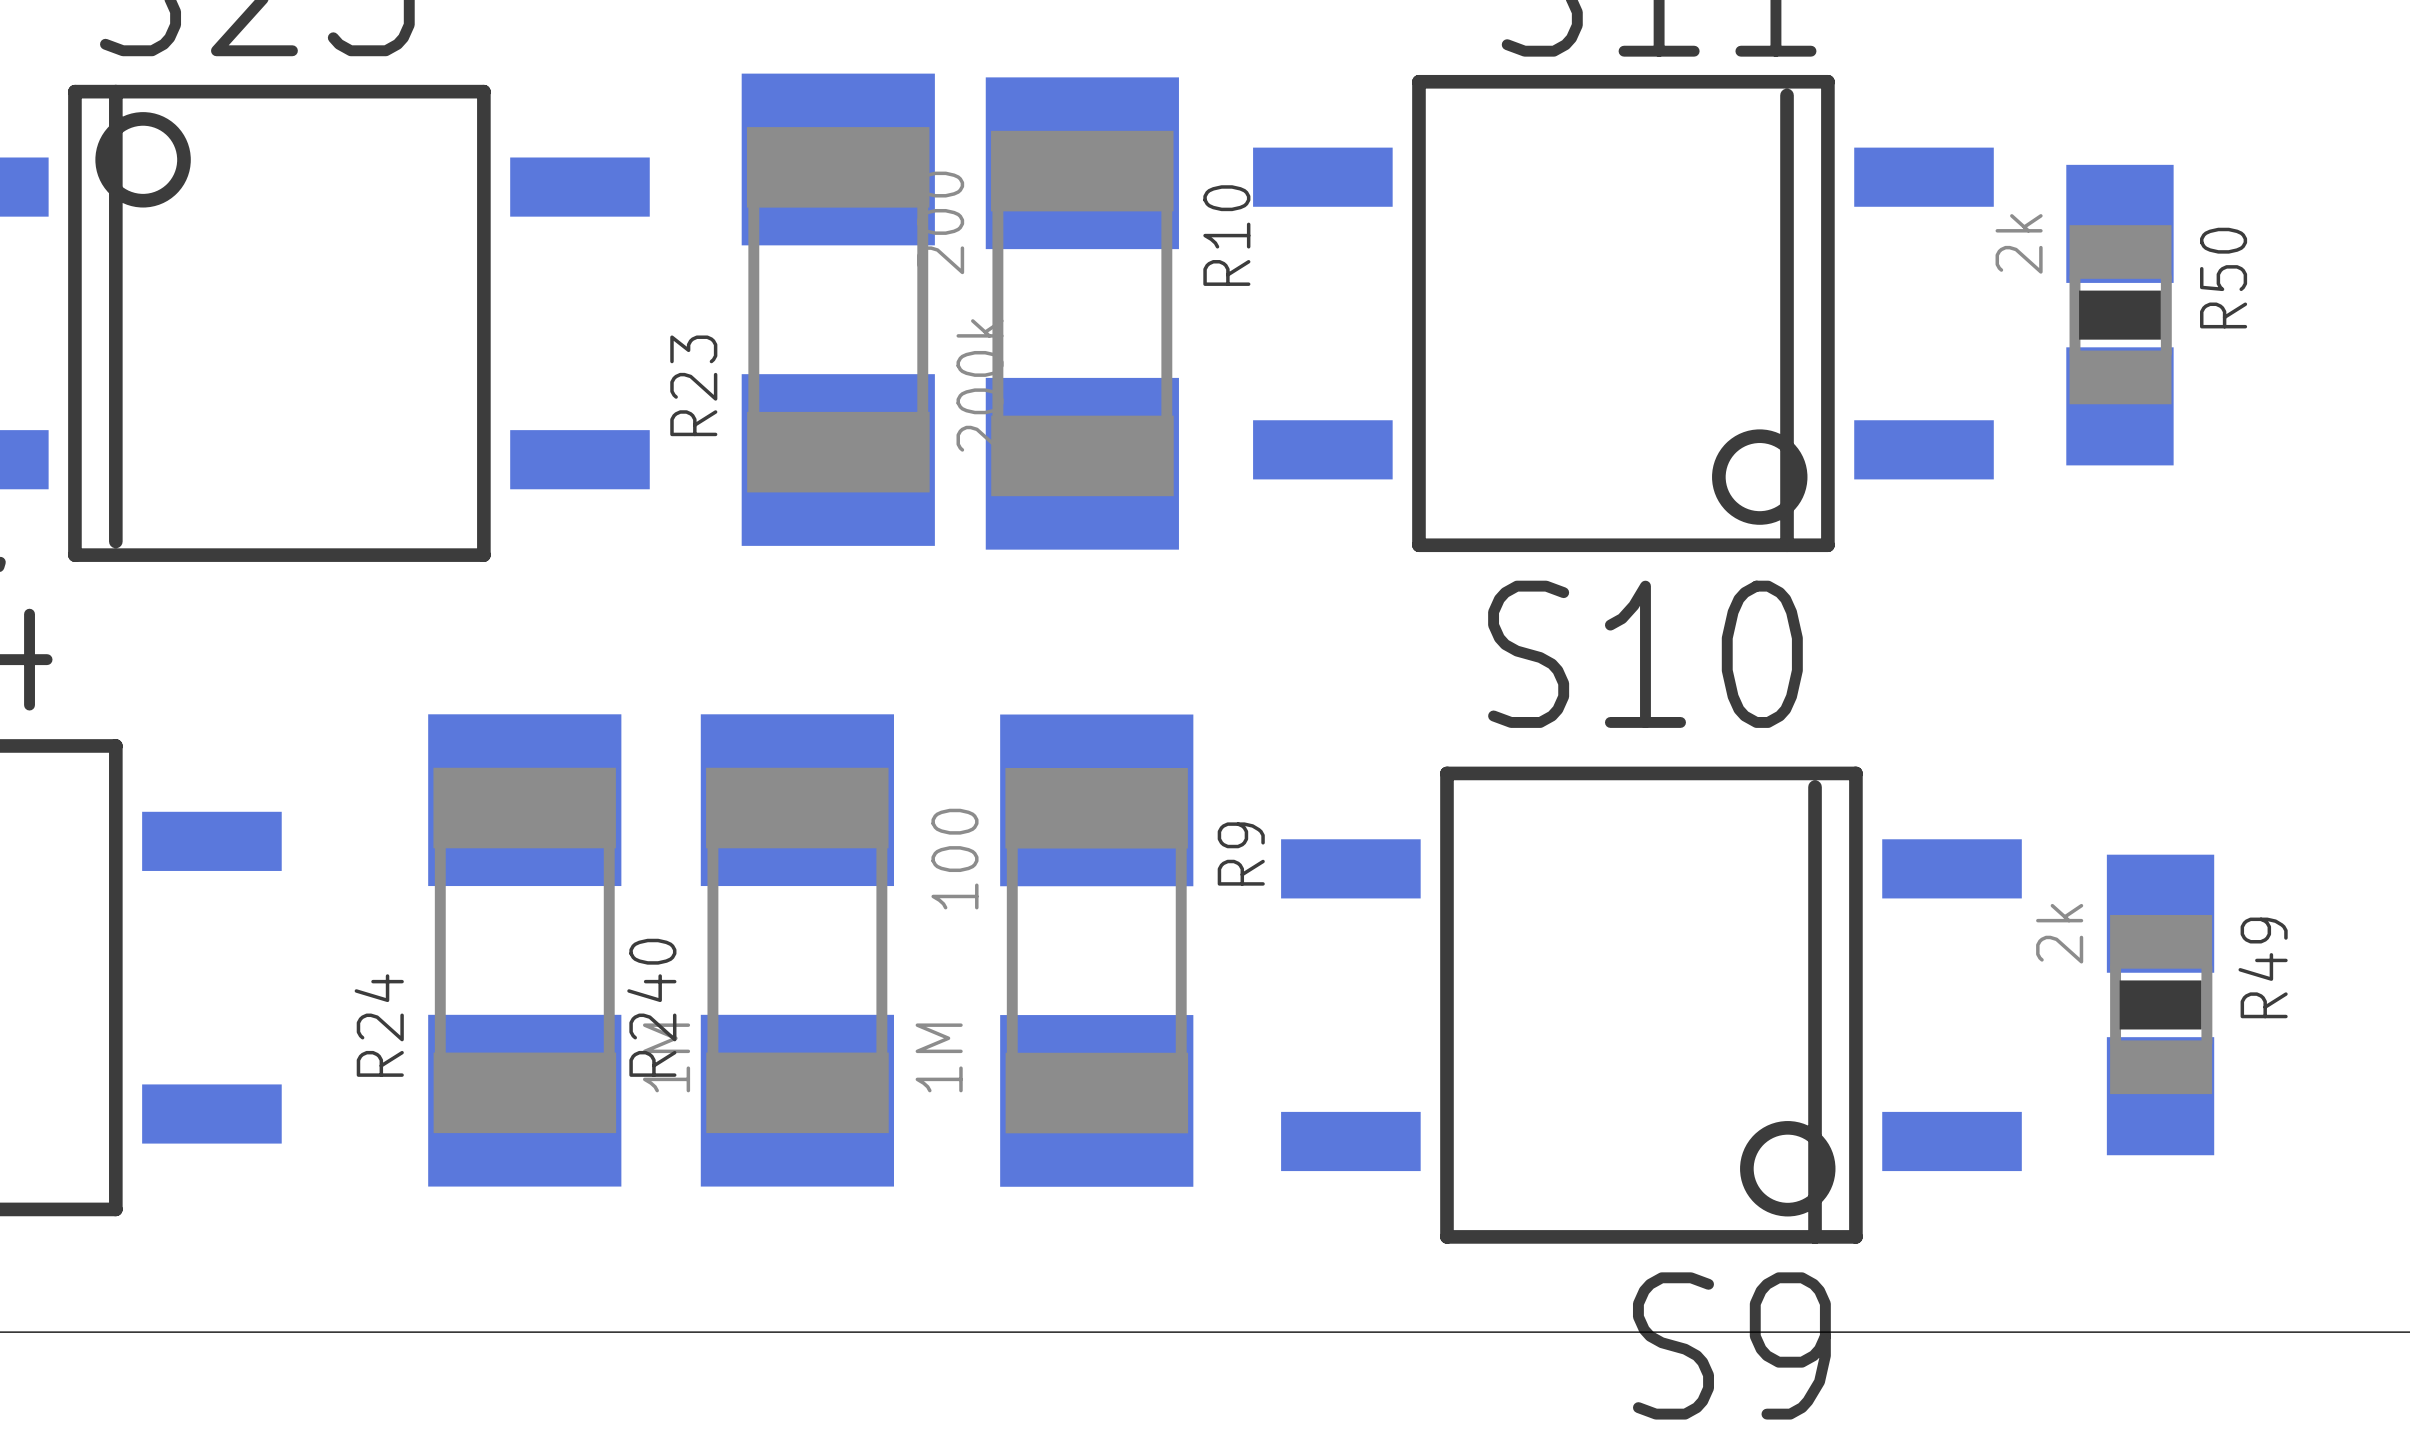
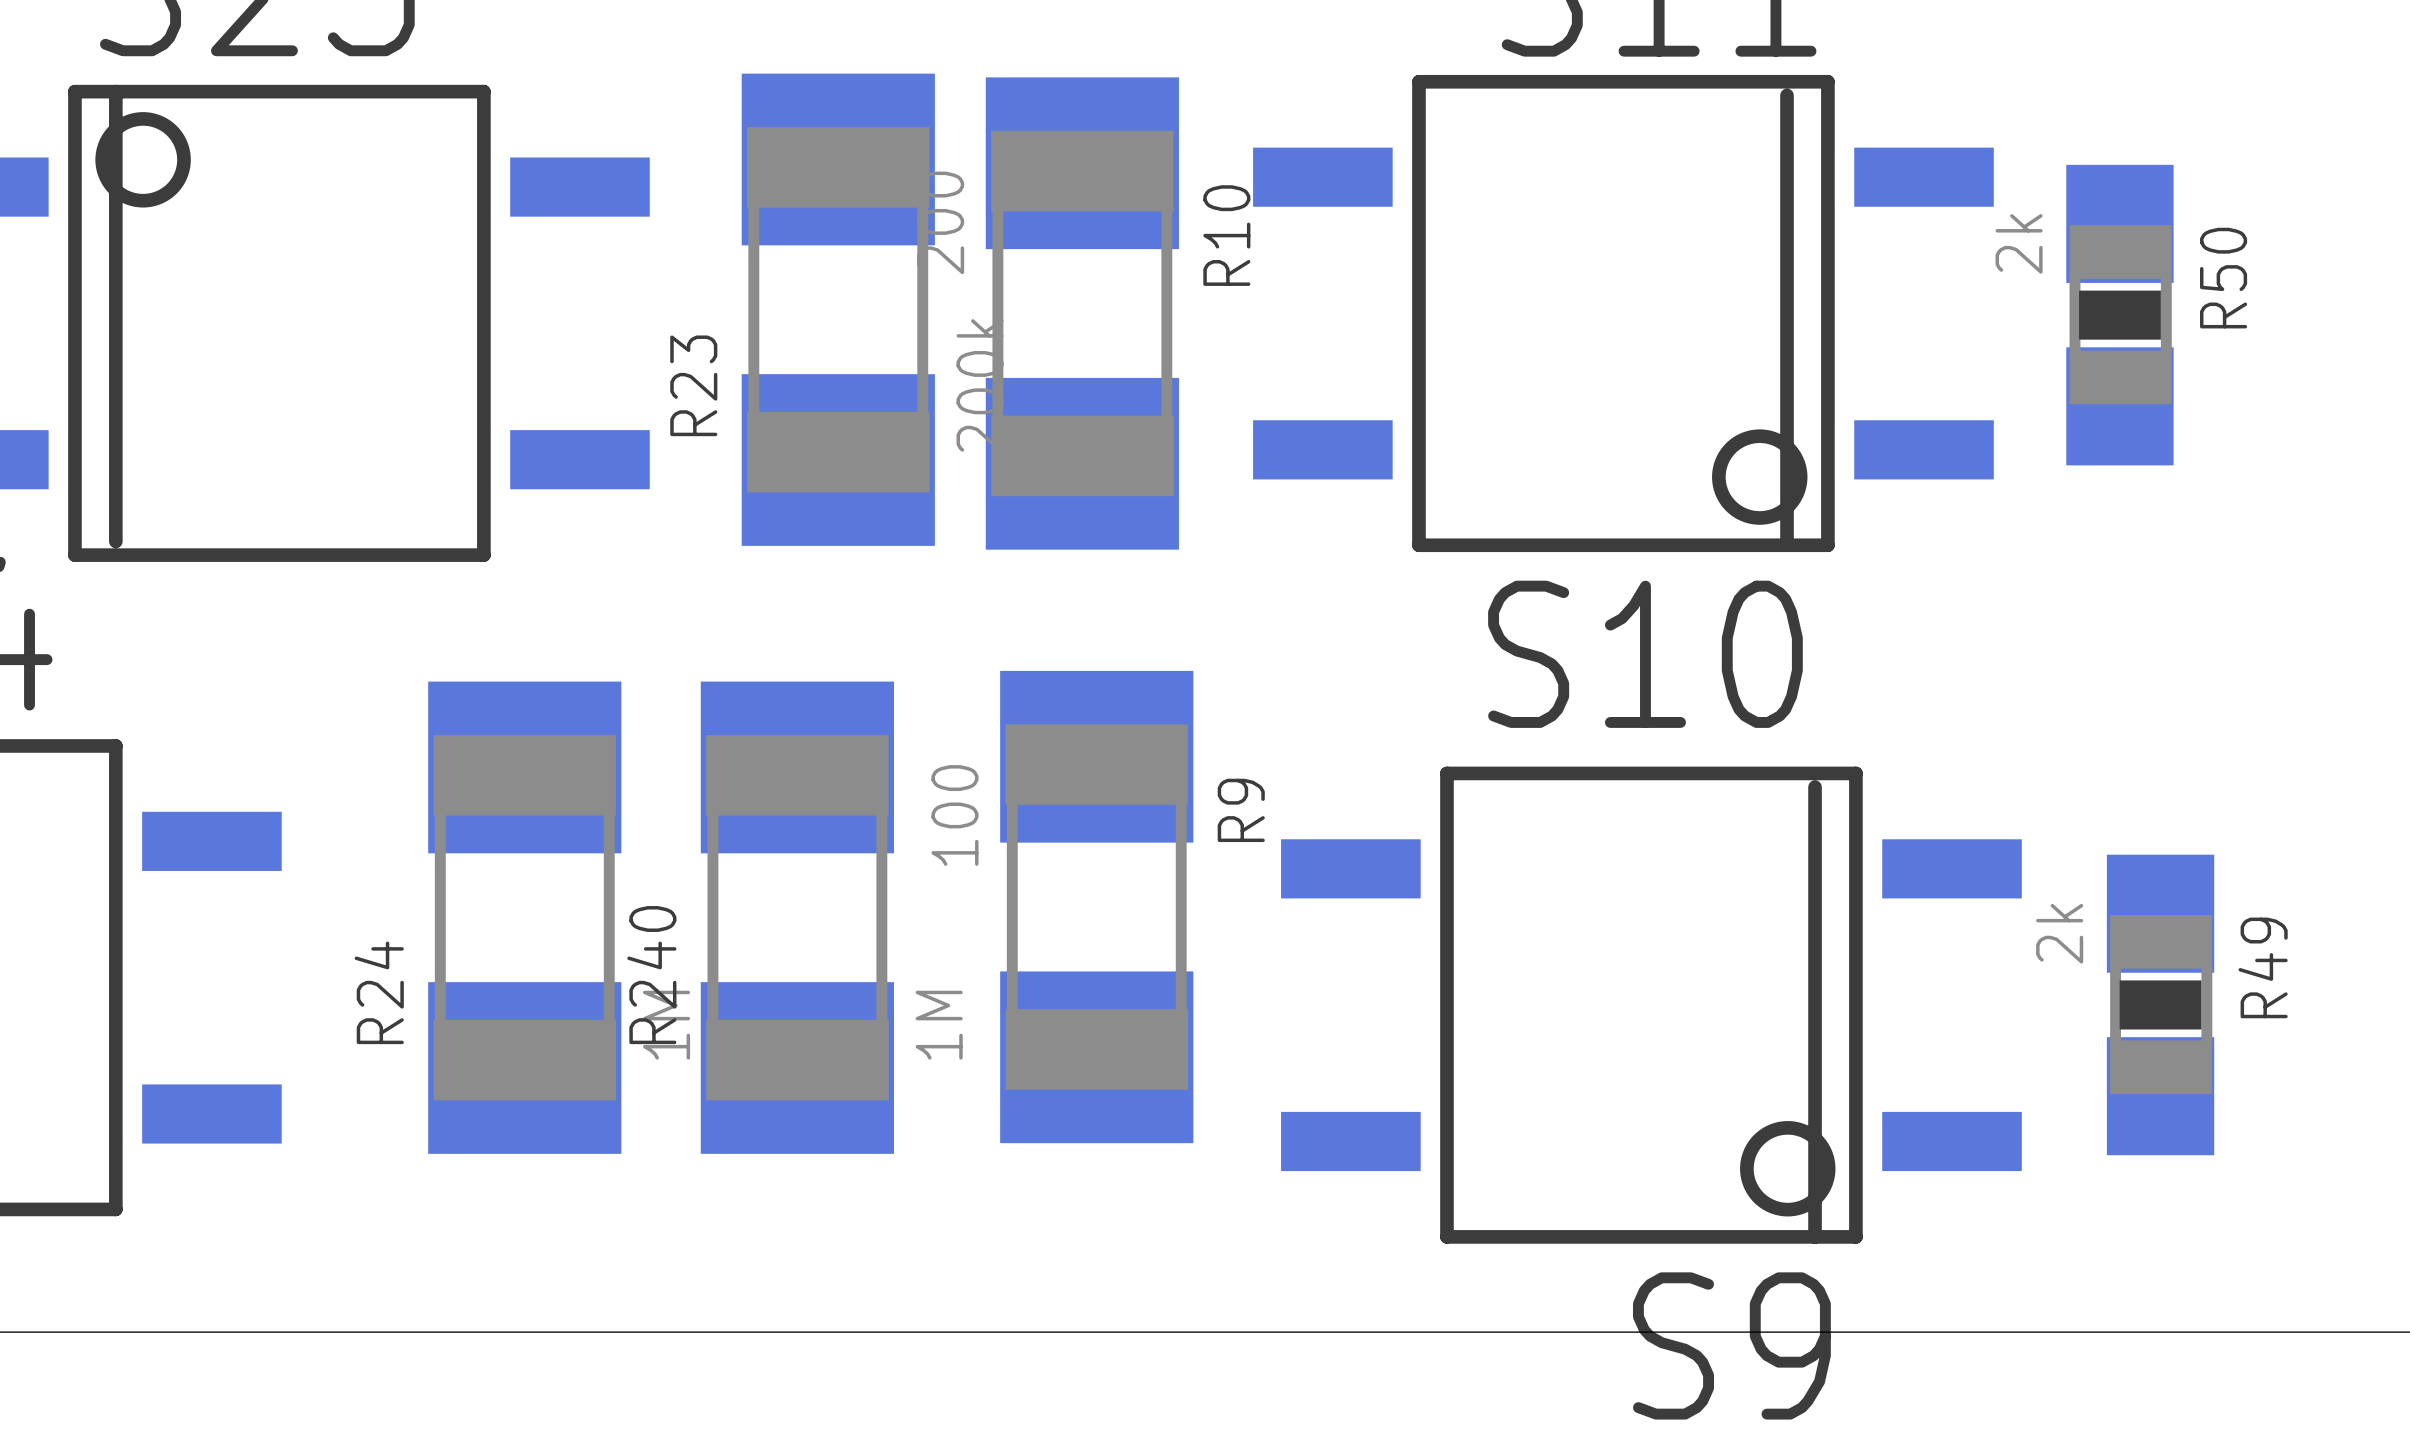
R24 position: (524, 950) -> (524, 917)
R240 position: (797, 950) -> (797, 917)
R9 position: (1096, 950) -> (1096, 907)

